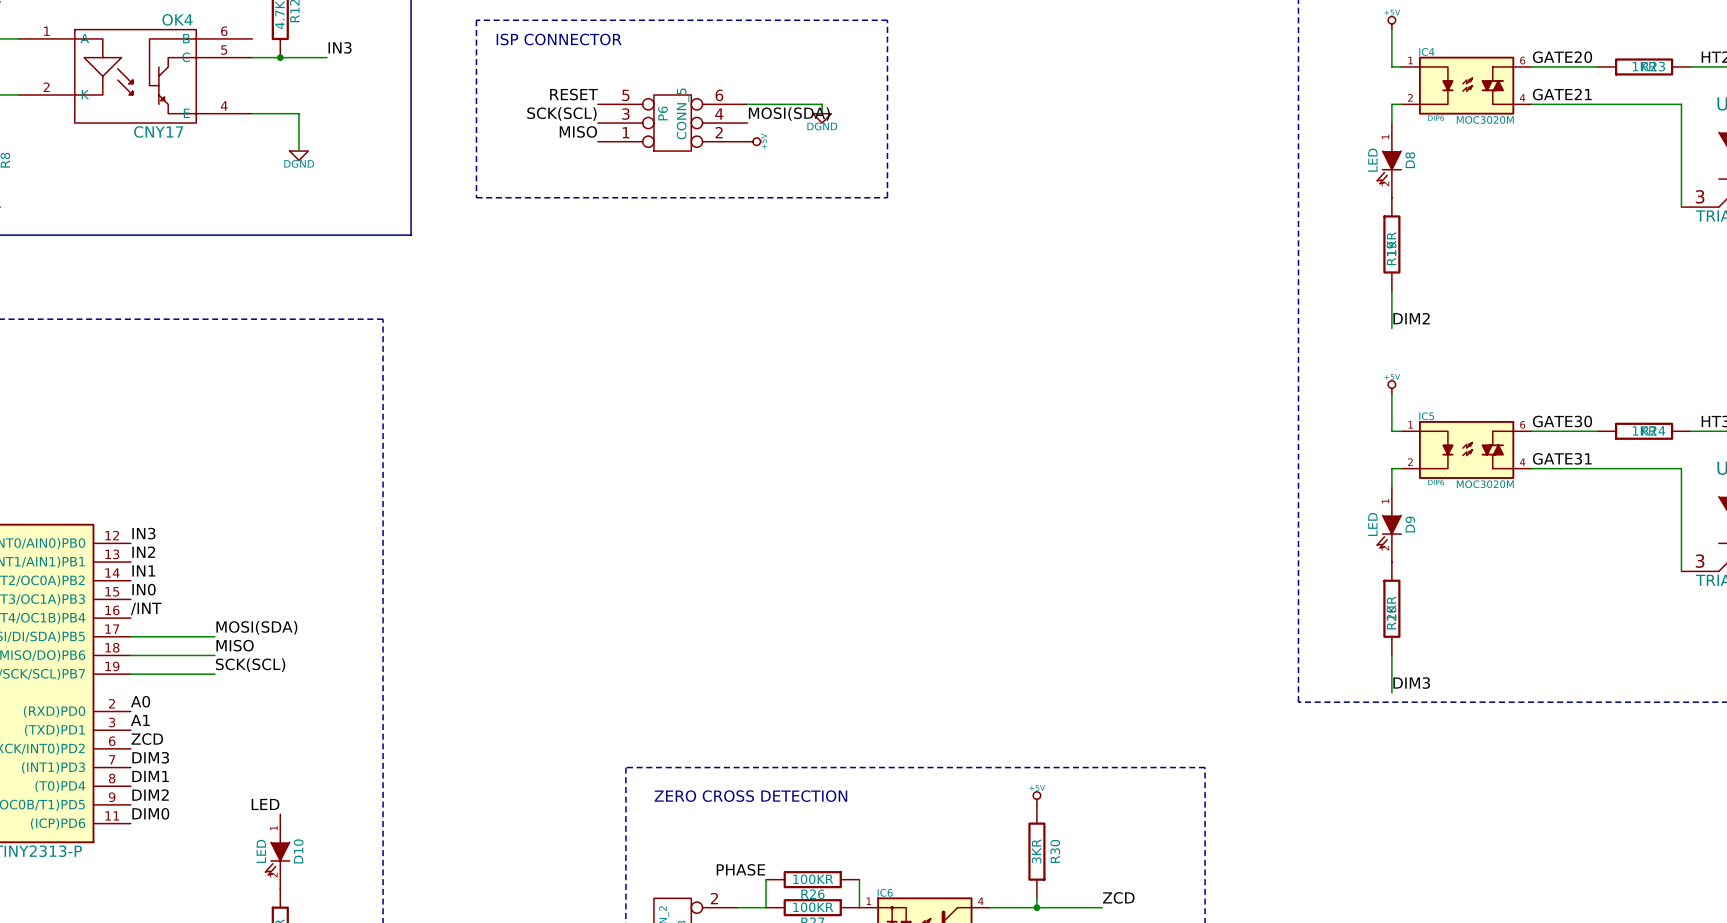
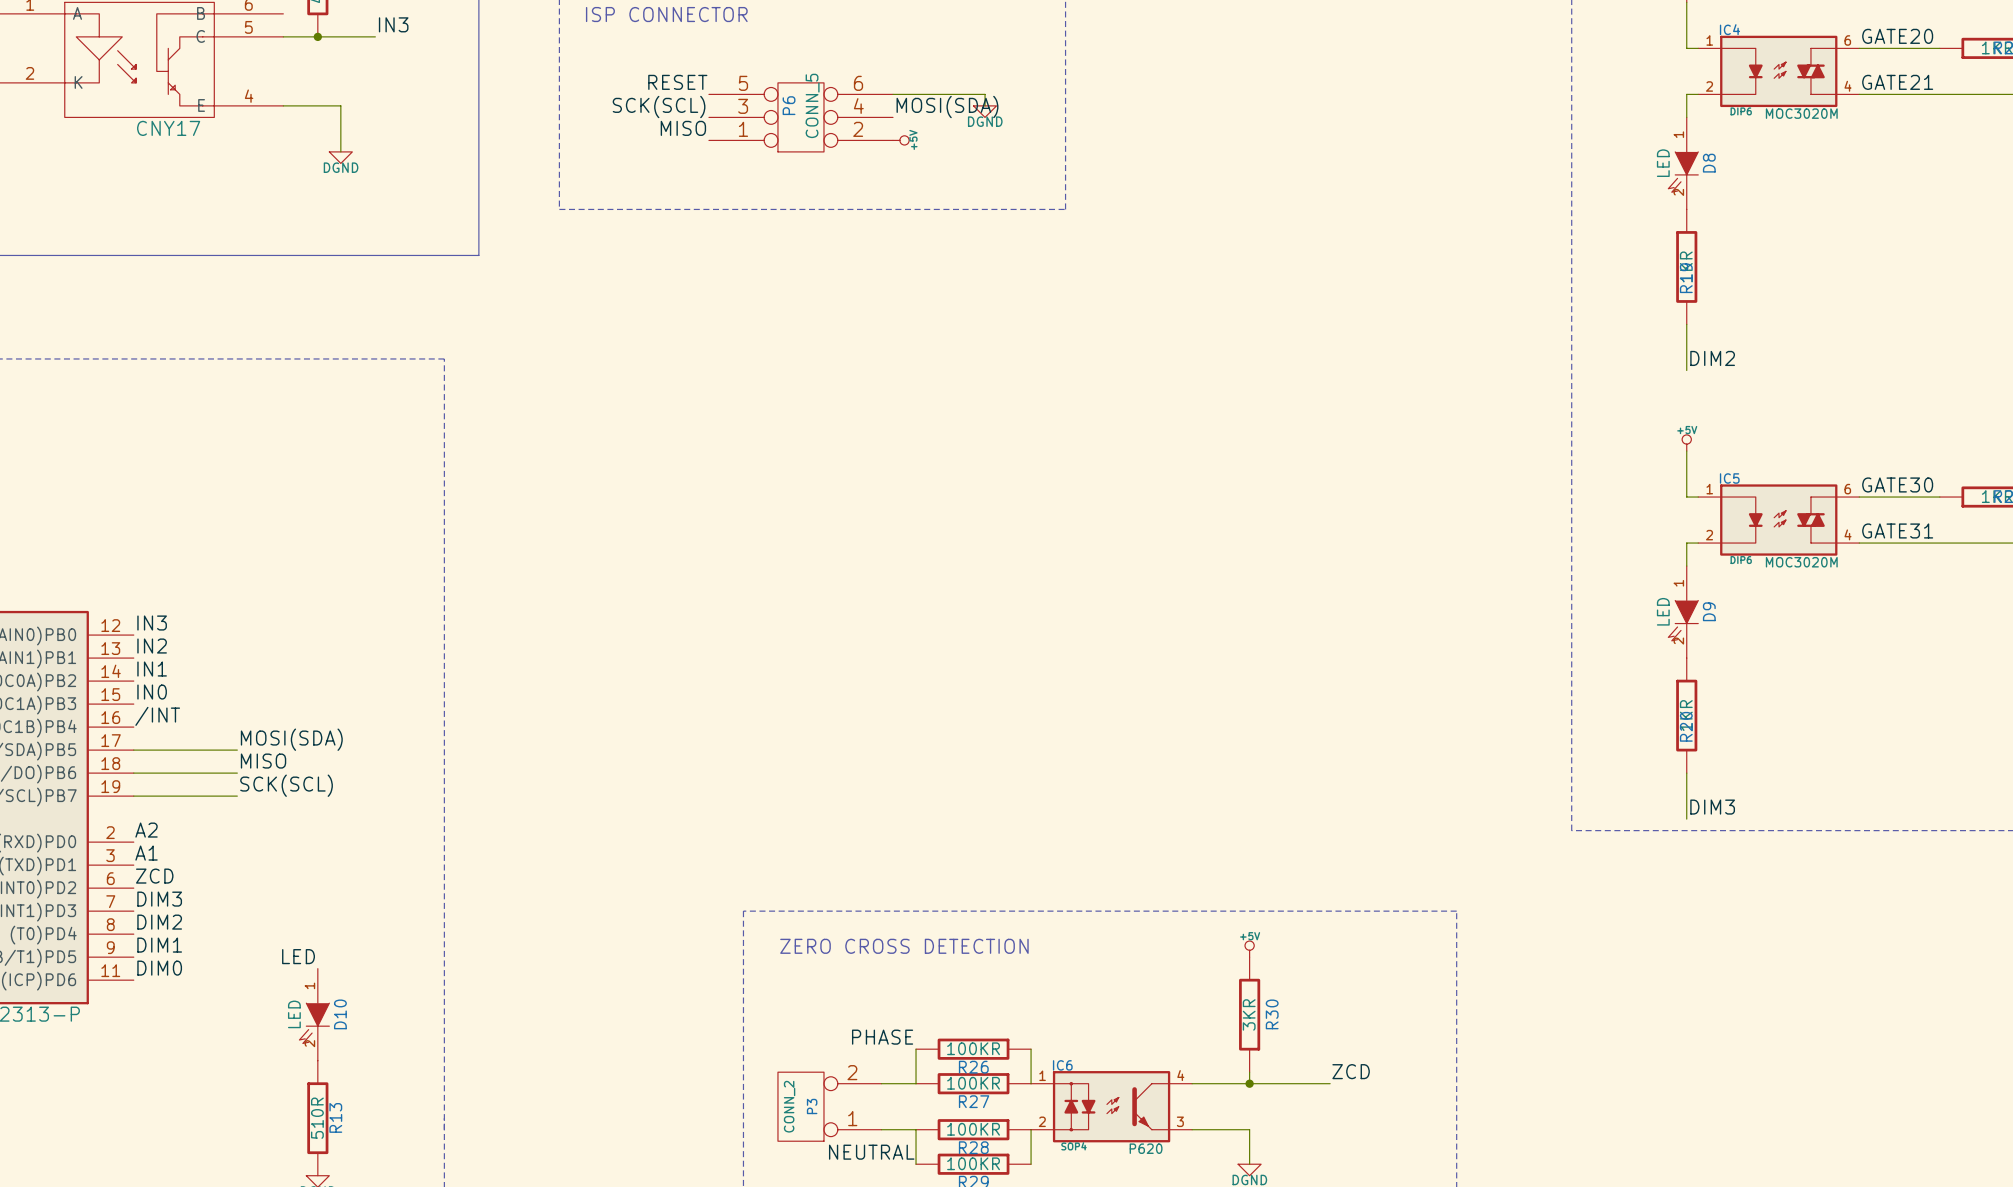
label: A0 (140, 701) -> A2 (146, 830)
label: DIM1 (150, 776) -> DIM2 (159, 922)
label: DIM2 (150, 795) -> DIM1 (159, 945)

